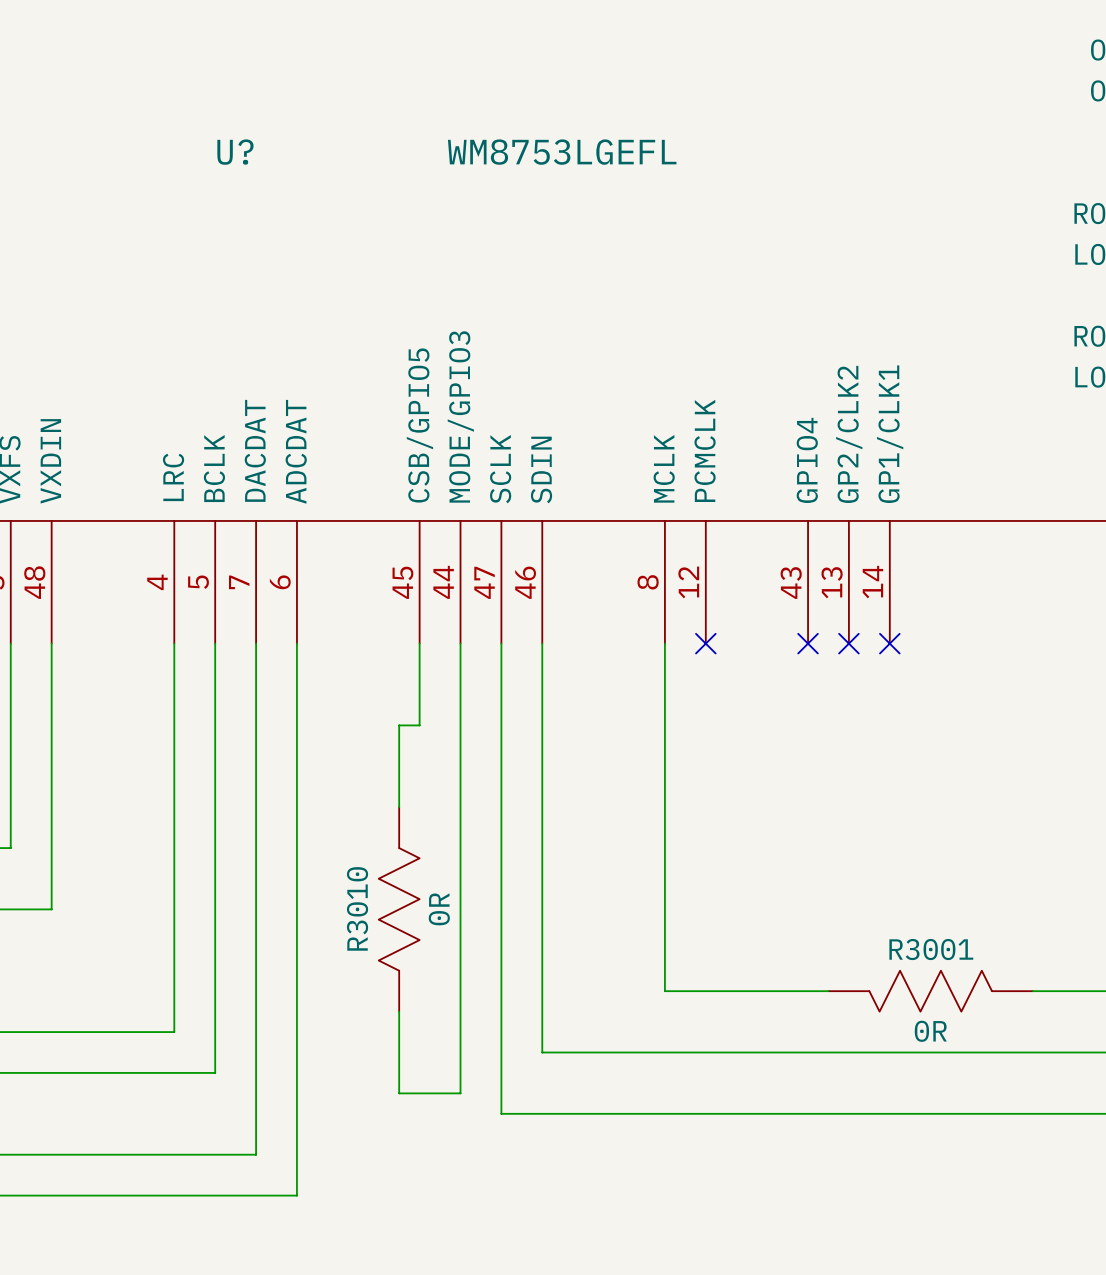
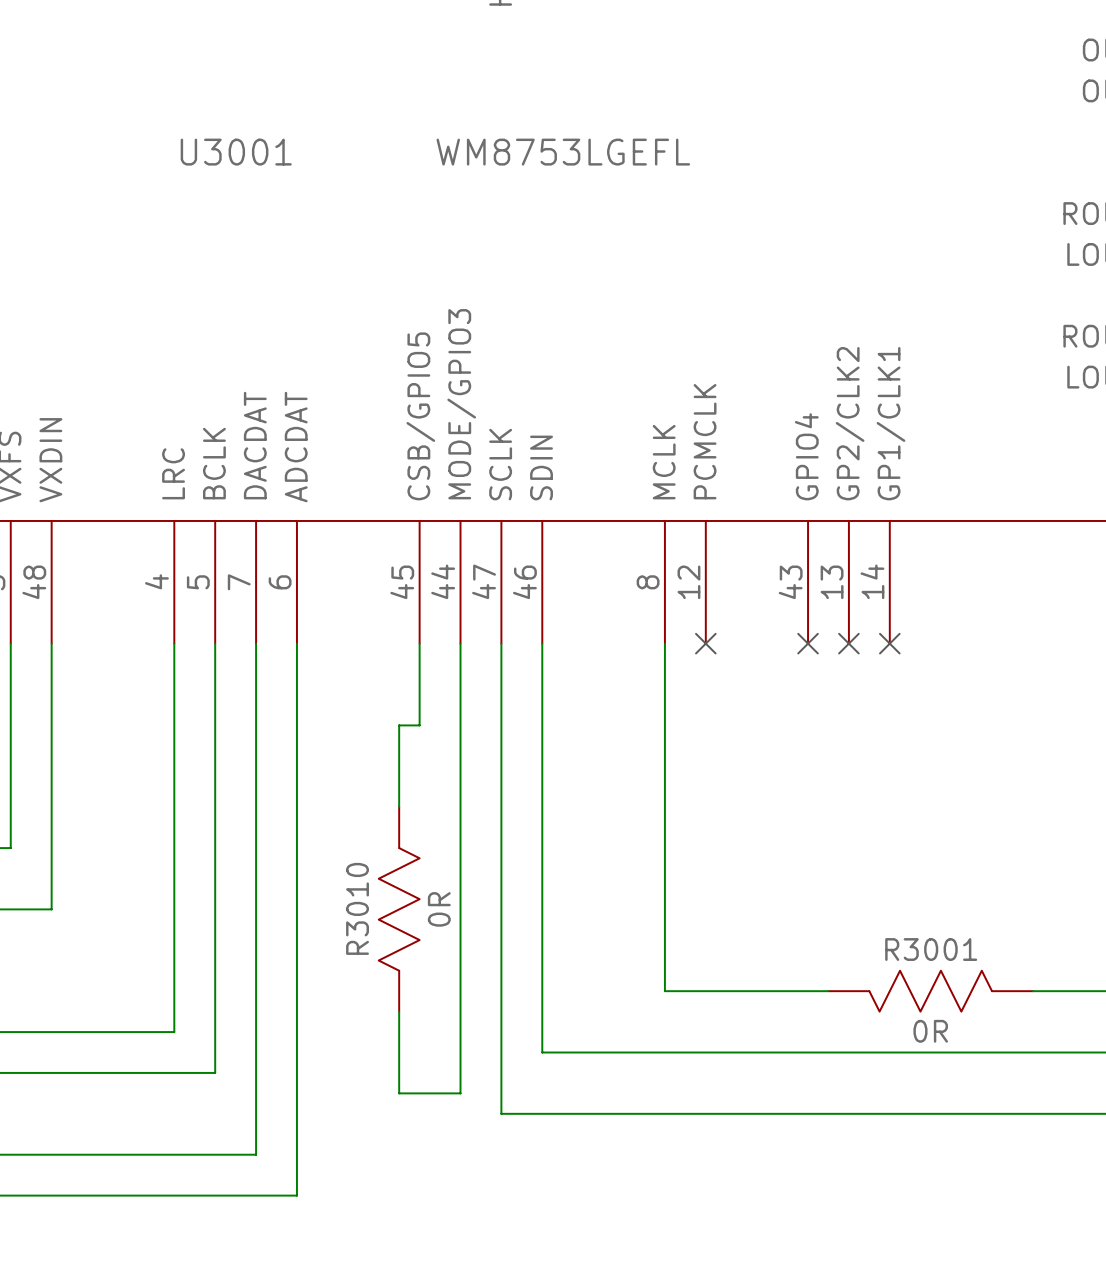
U? name: U? (235, 152) -> U3001 (236, 152)

